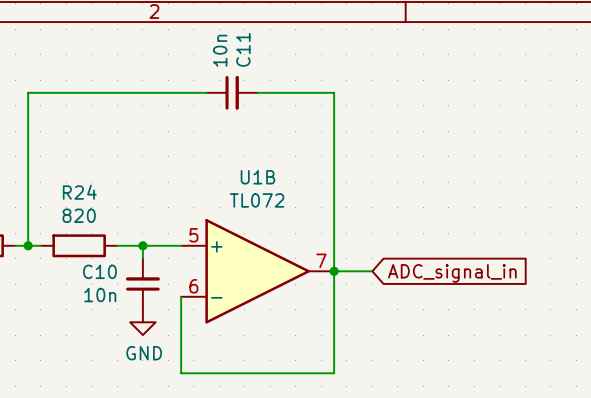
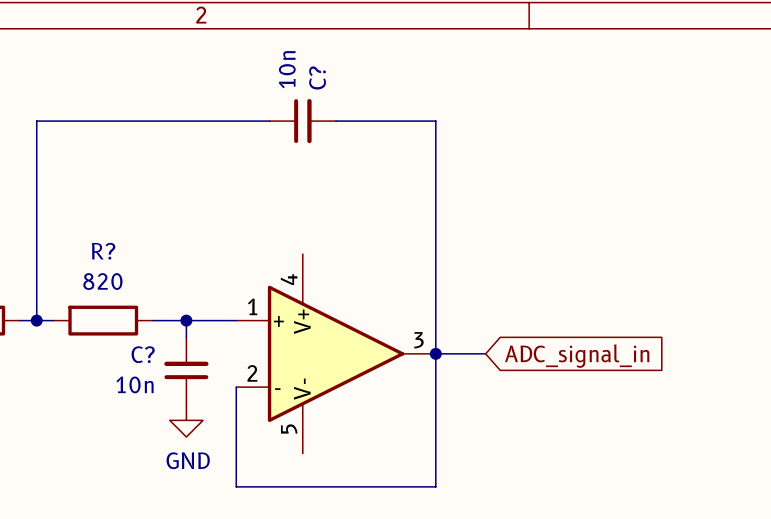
C11 name: C11 (243, 49) -> C? (317, 77)
R24 name: R24 (79, 192) -> R? (103, 251)
C10 name: C10 (99, 271) -> C? (143, 354)
U1B: TL072 (257, 271) -> none
part: none -> (336, 353)

